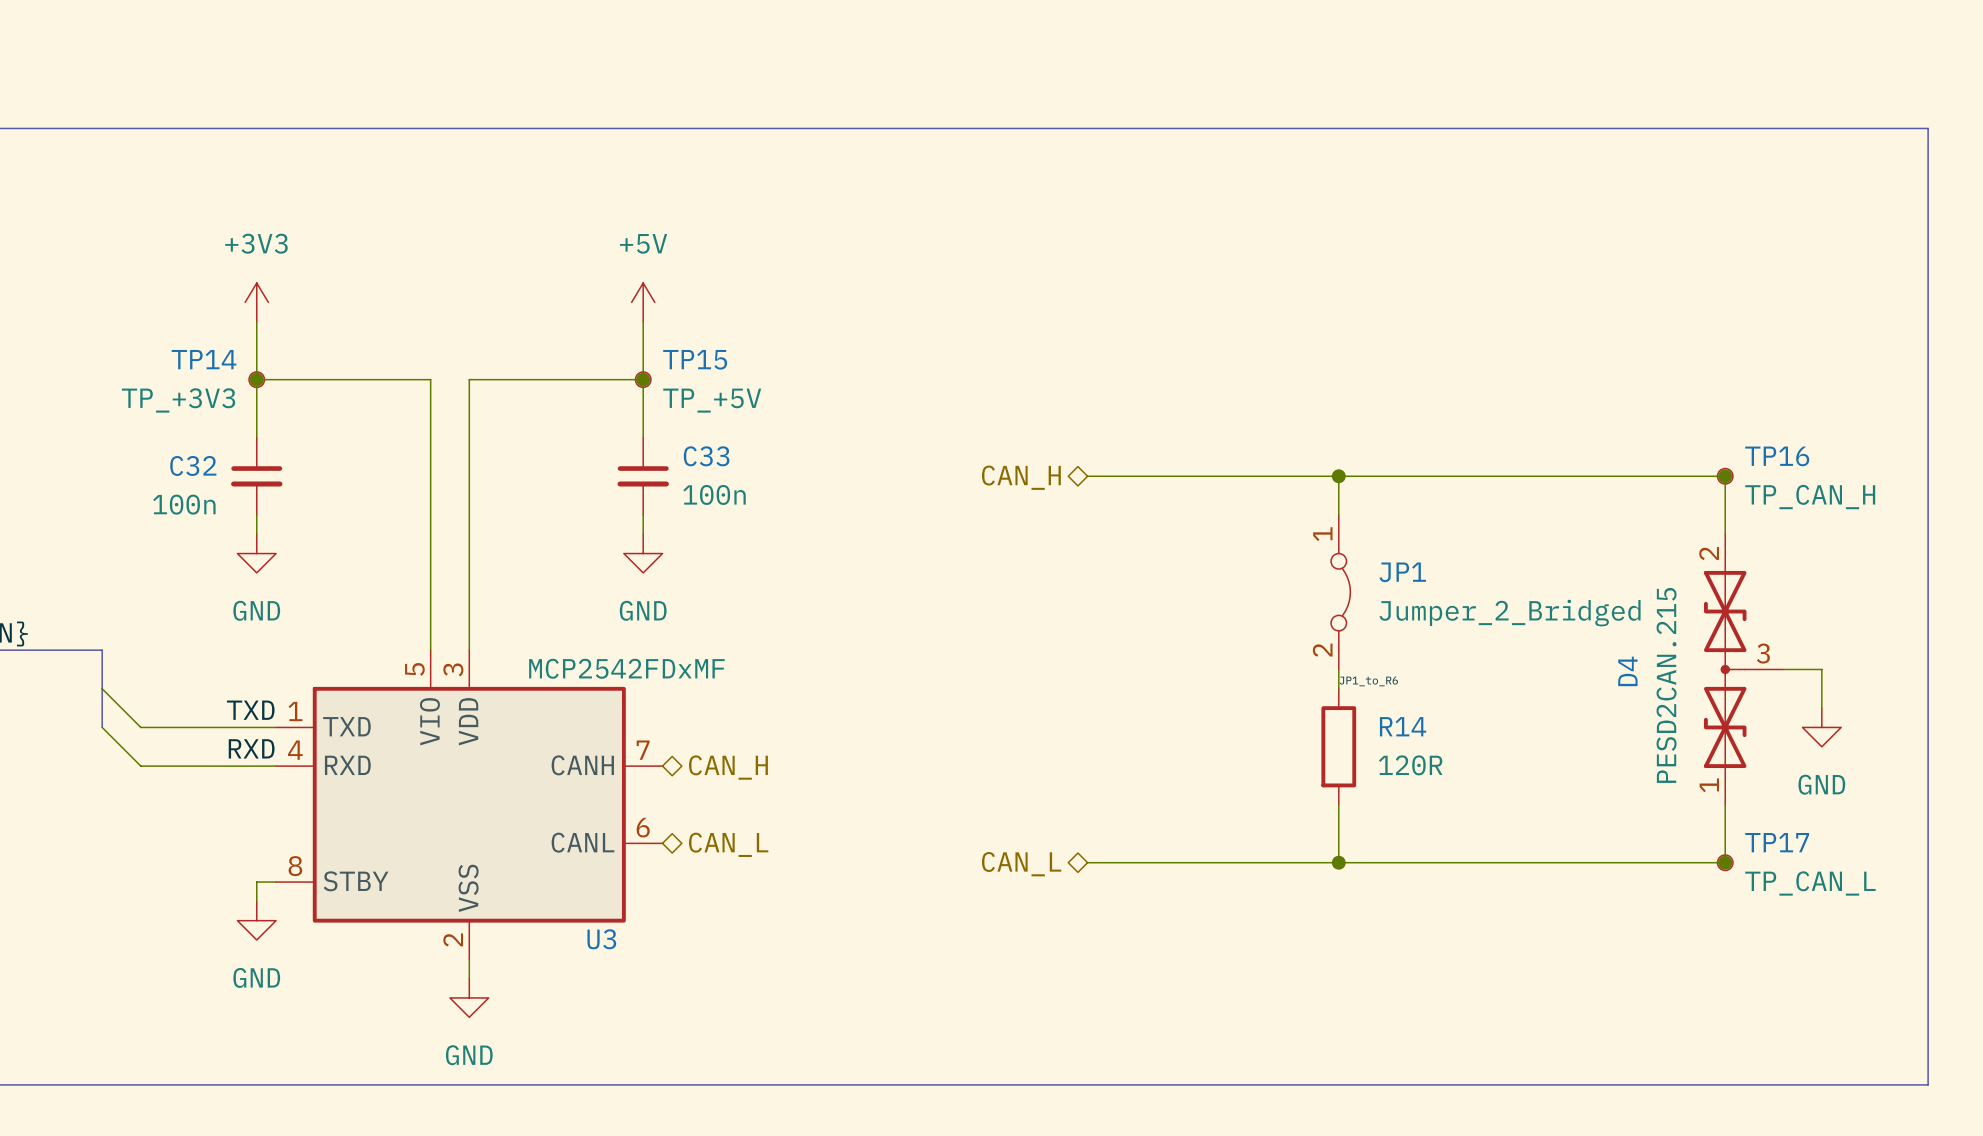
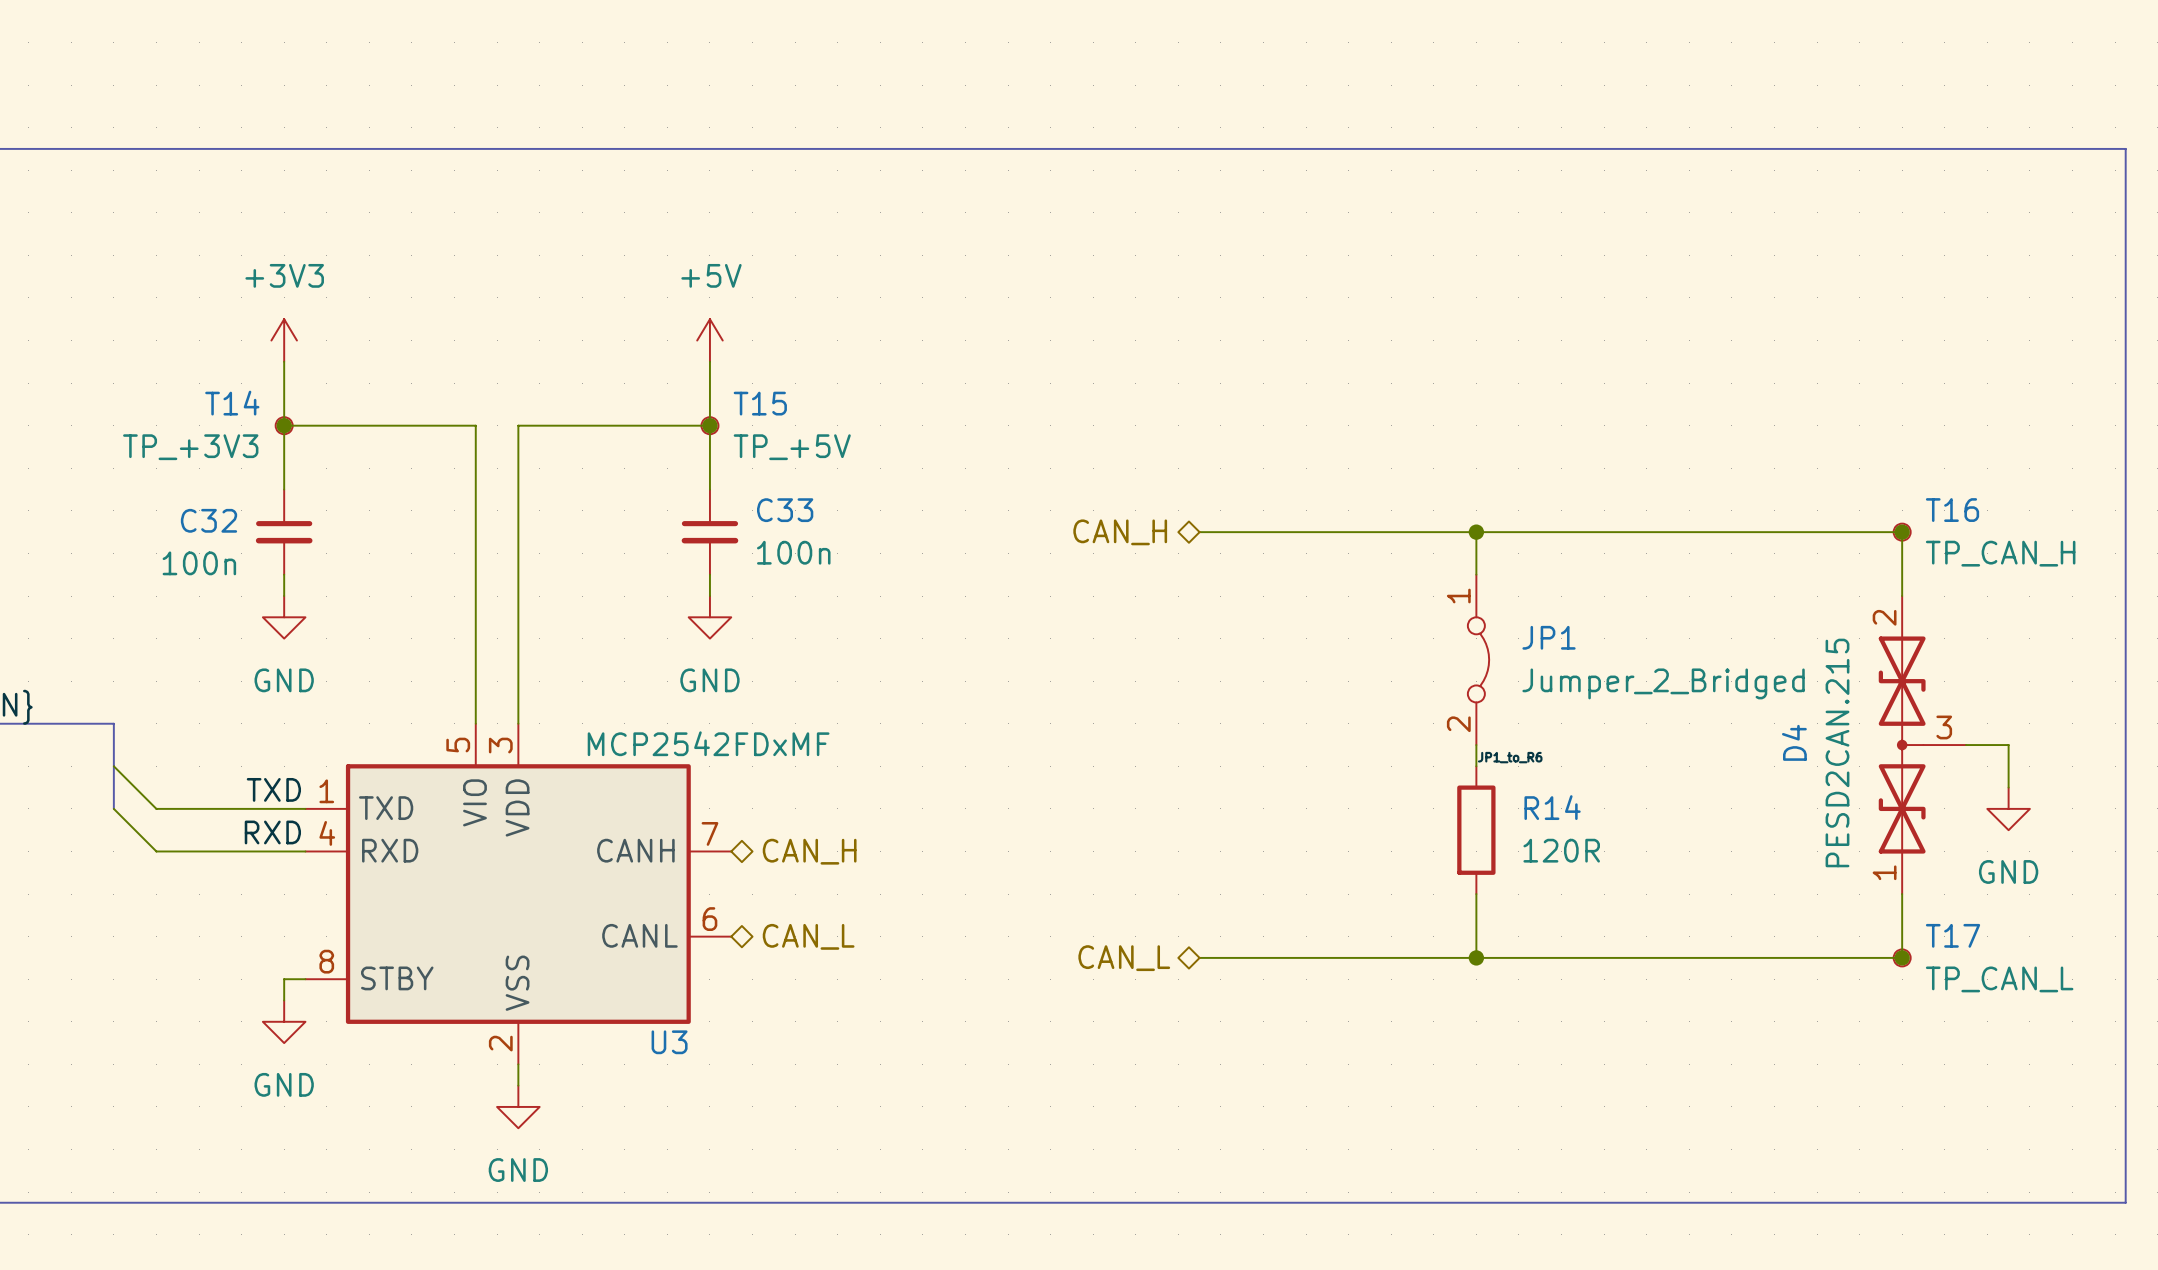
TP14 name: TP14 (204, 359) -> T14 (232, 403)
TP15 name: TP15 (695, 359) -> T15 (760, 403)
TP16 name: TP16 (1777, 456) -> T16 (1952, 510)
TP17 name: TP17 (1777, 842) -> T17 (1953, 935)

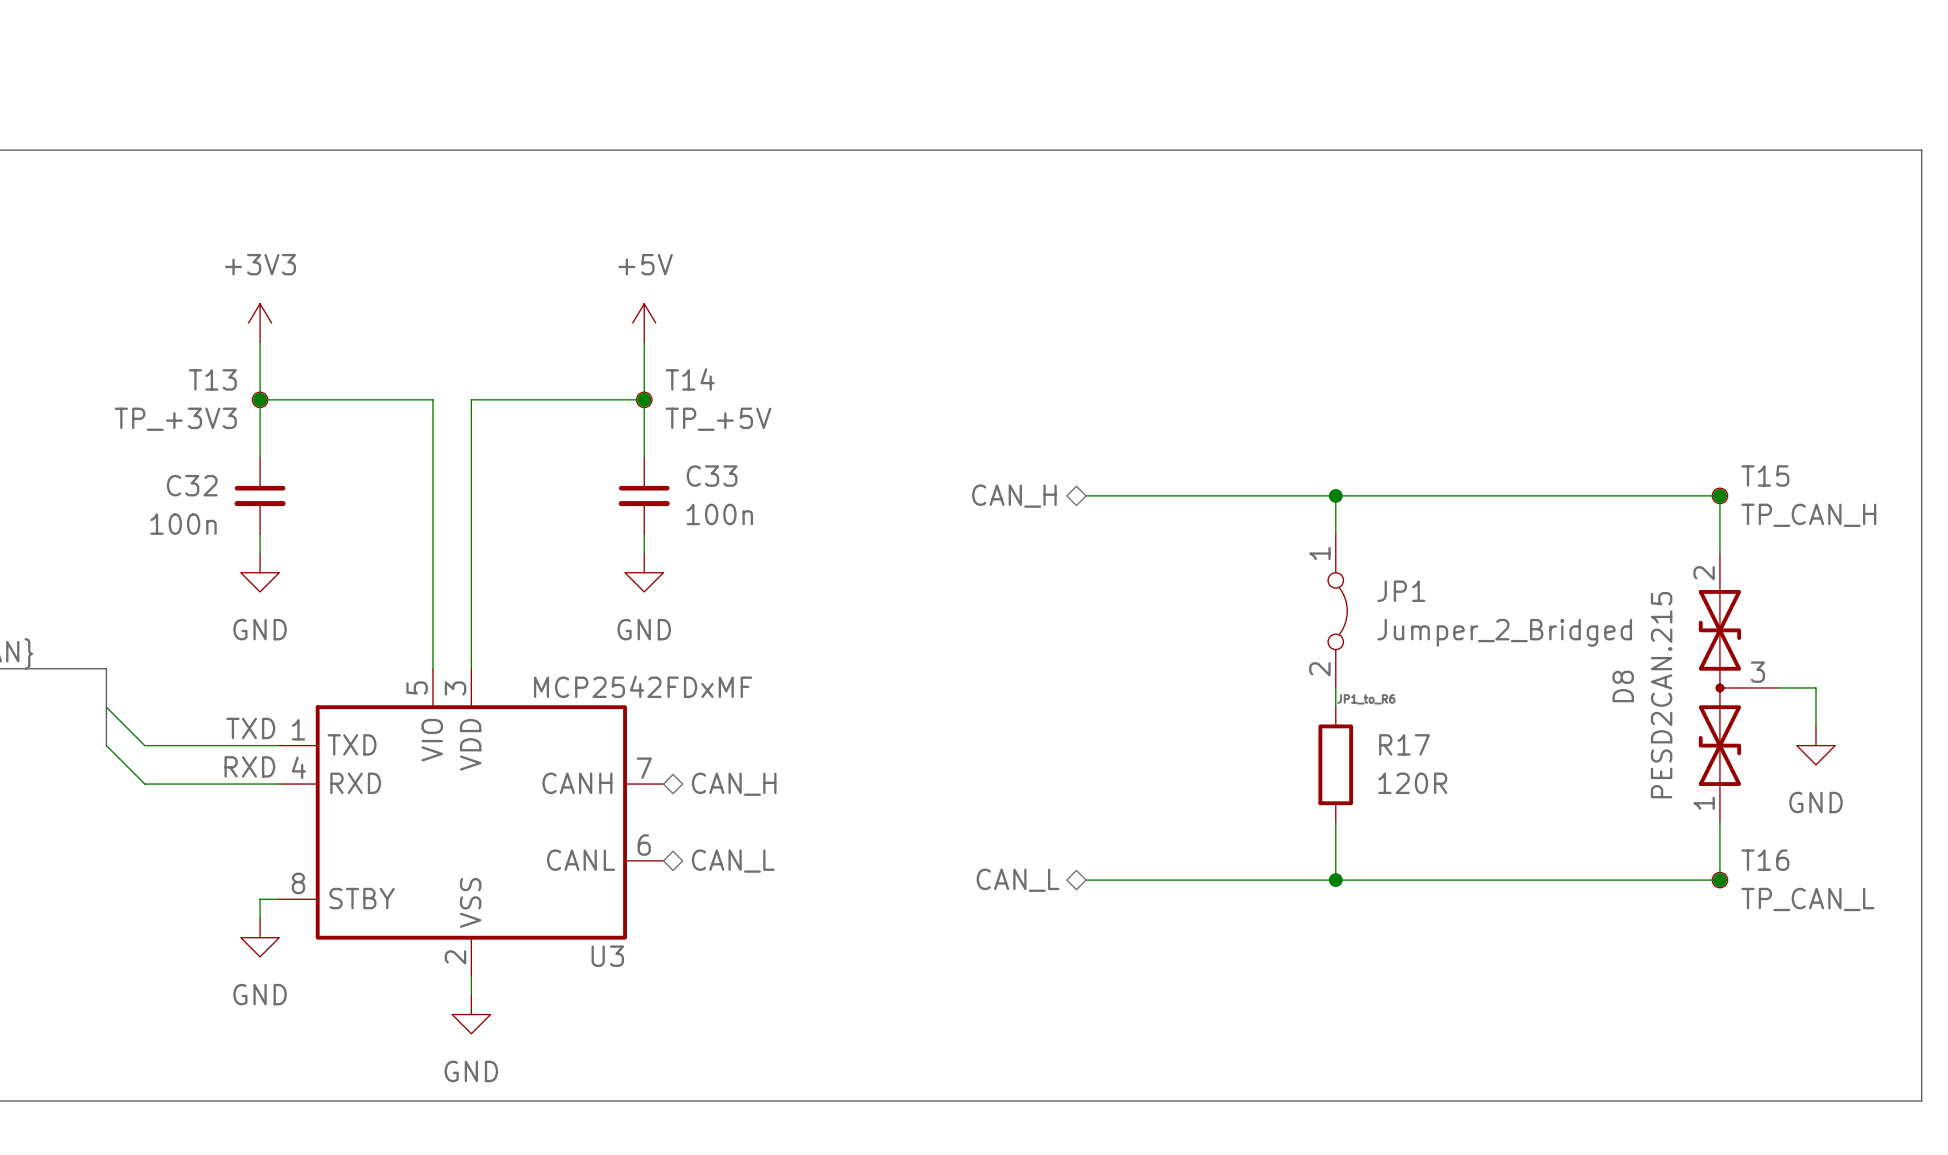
T14 name: T14 (232, 403) -> T13 (212, 379)
T15 name: T15 (760, 403) -> T14 (690, 379)
T16 name: T16 (1952, 510) -> T15 (1765, 475)
D4 name: D4 (1794, 742) -> D8 (1623, 686)
R14 name: R14 (1552, 807) -> R17 (1404, 744)
T17 name: T17 (1953, 935) -> T16 (1765, 860)

